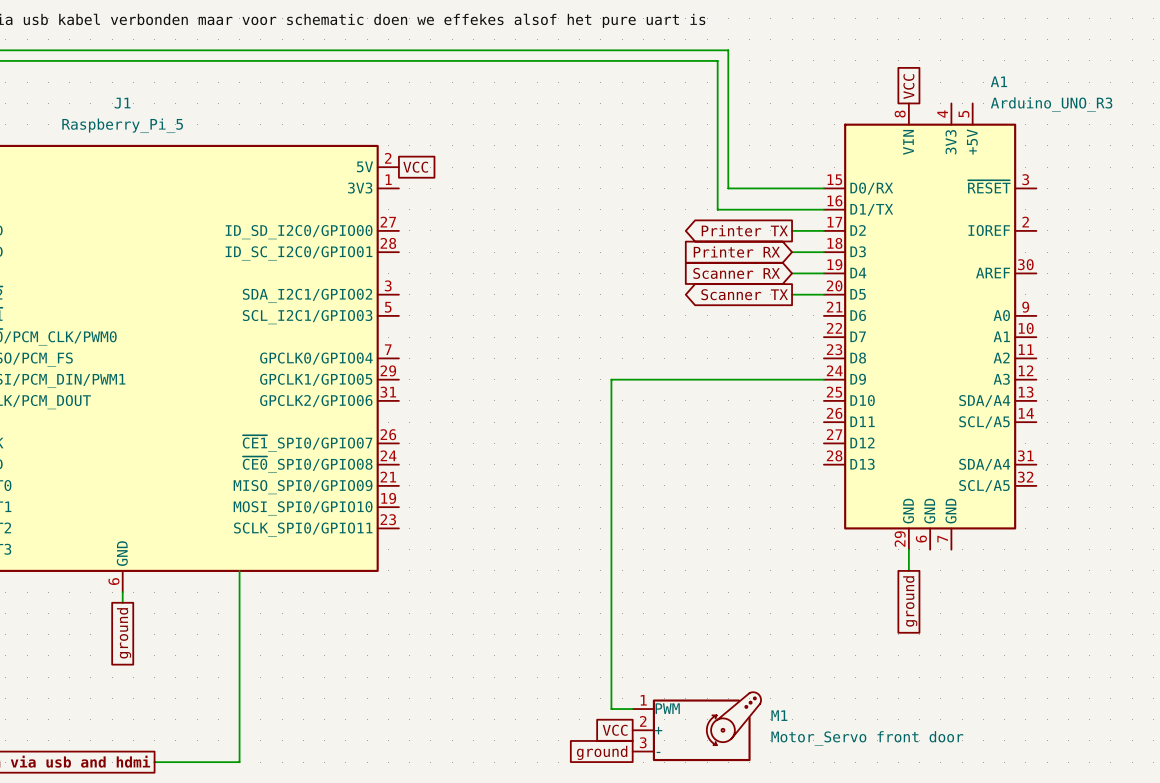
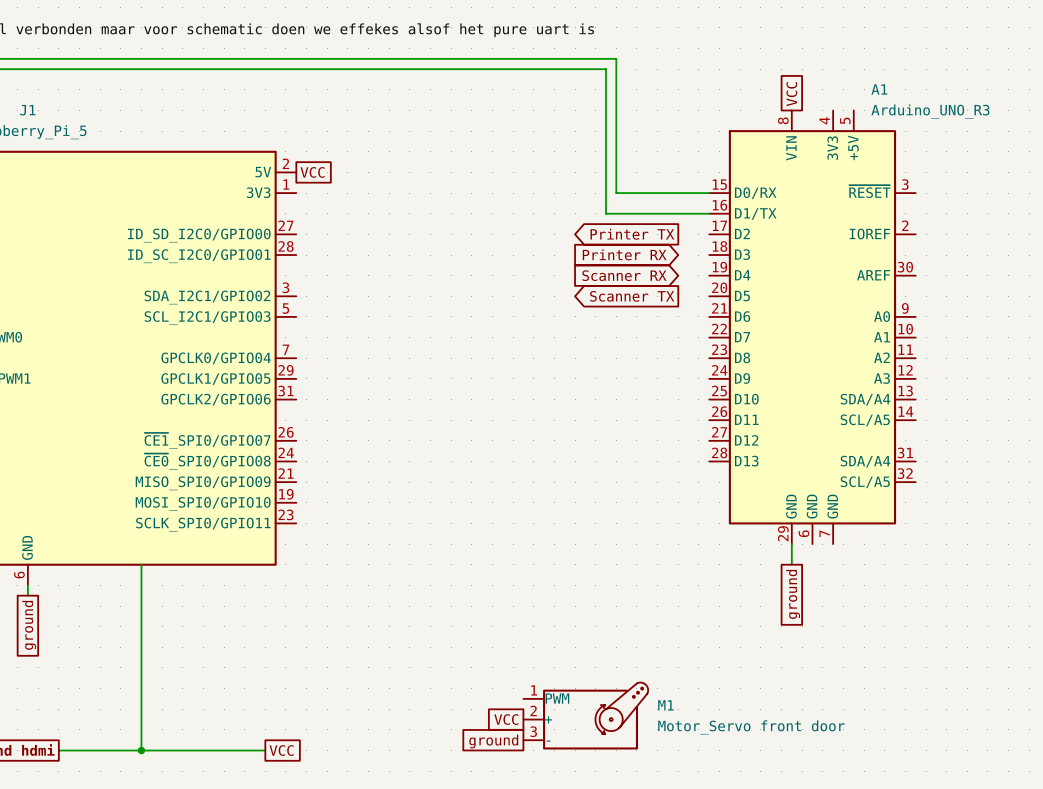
wire: (792, 230) (823, 230) -> none
wire: (792, 252) (823, 252) -> none
wire: (792, 273) (823, 273) -> none
wire: (792, 294) (823, 294) -> none
wire: (823, 379) (611, 379) (611, 709) (632, 709) -> none
wire: none -> (141, 750) (265, 750)
junction: none -> (141, 750)
global label: none -> VCC (281, 750)

